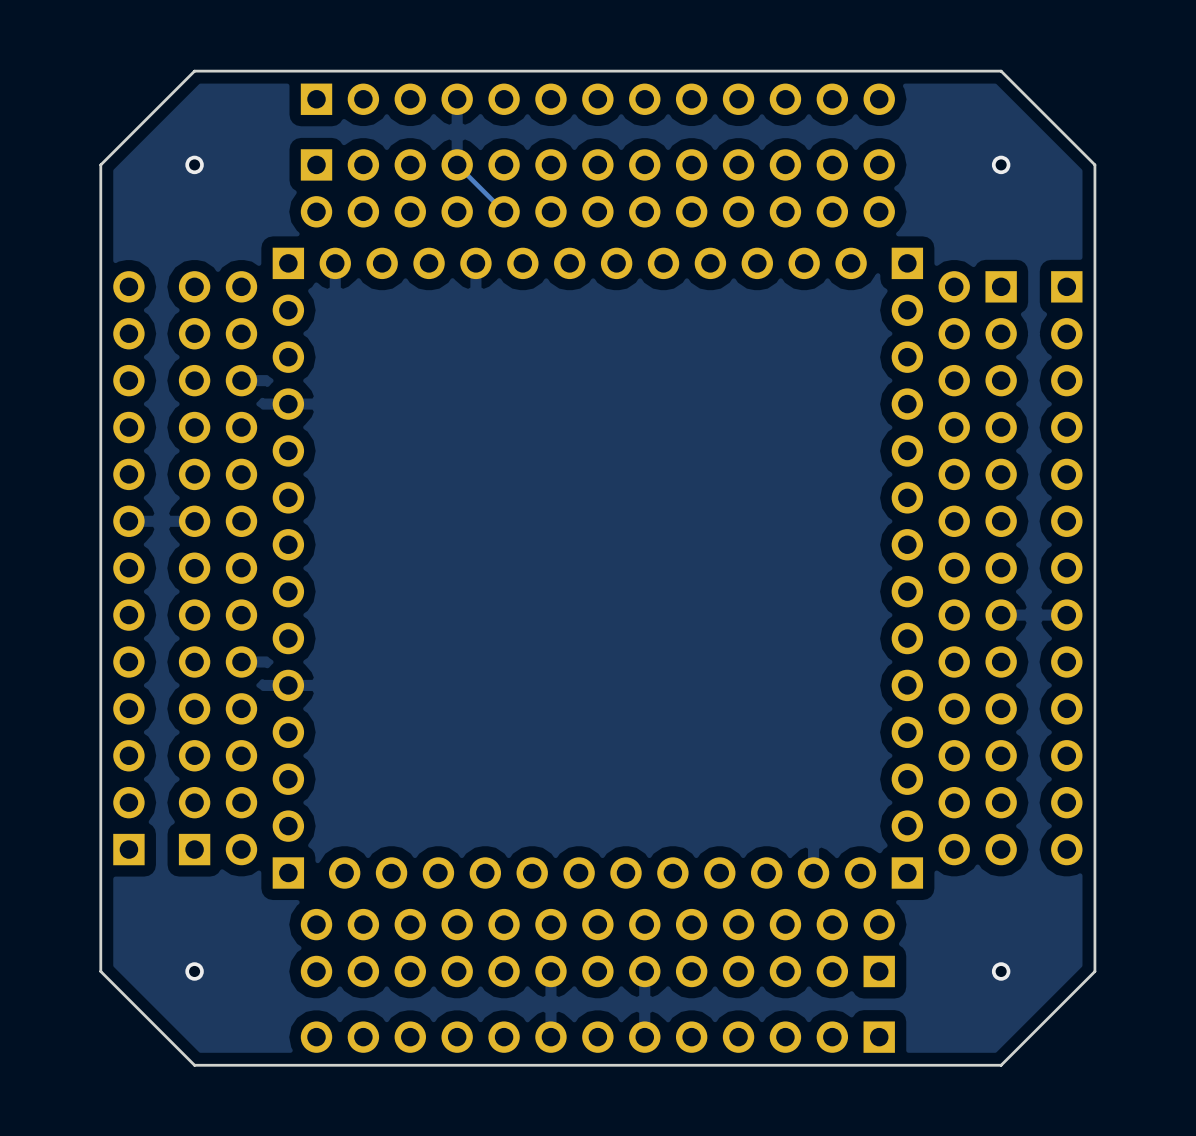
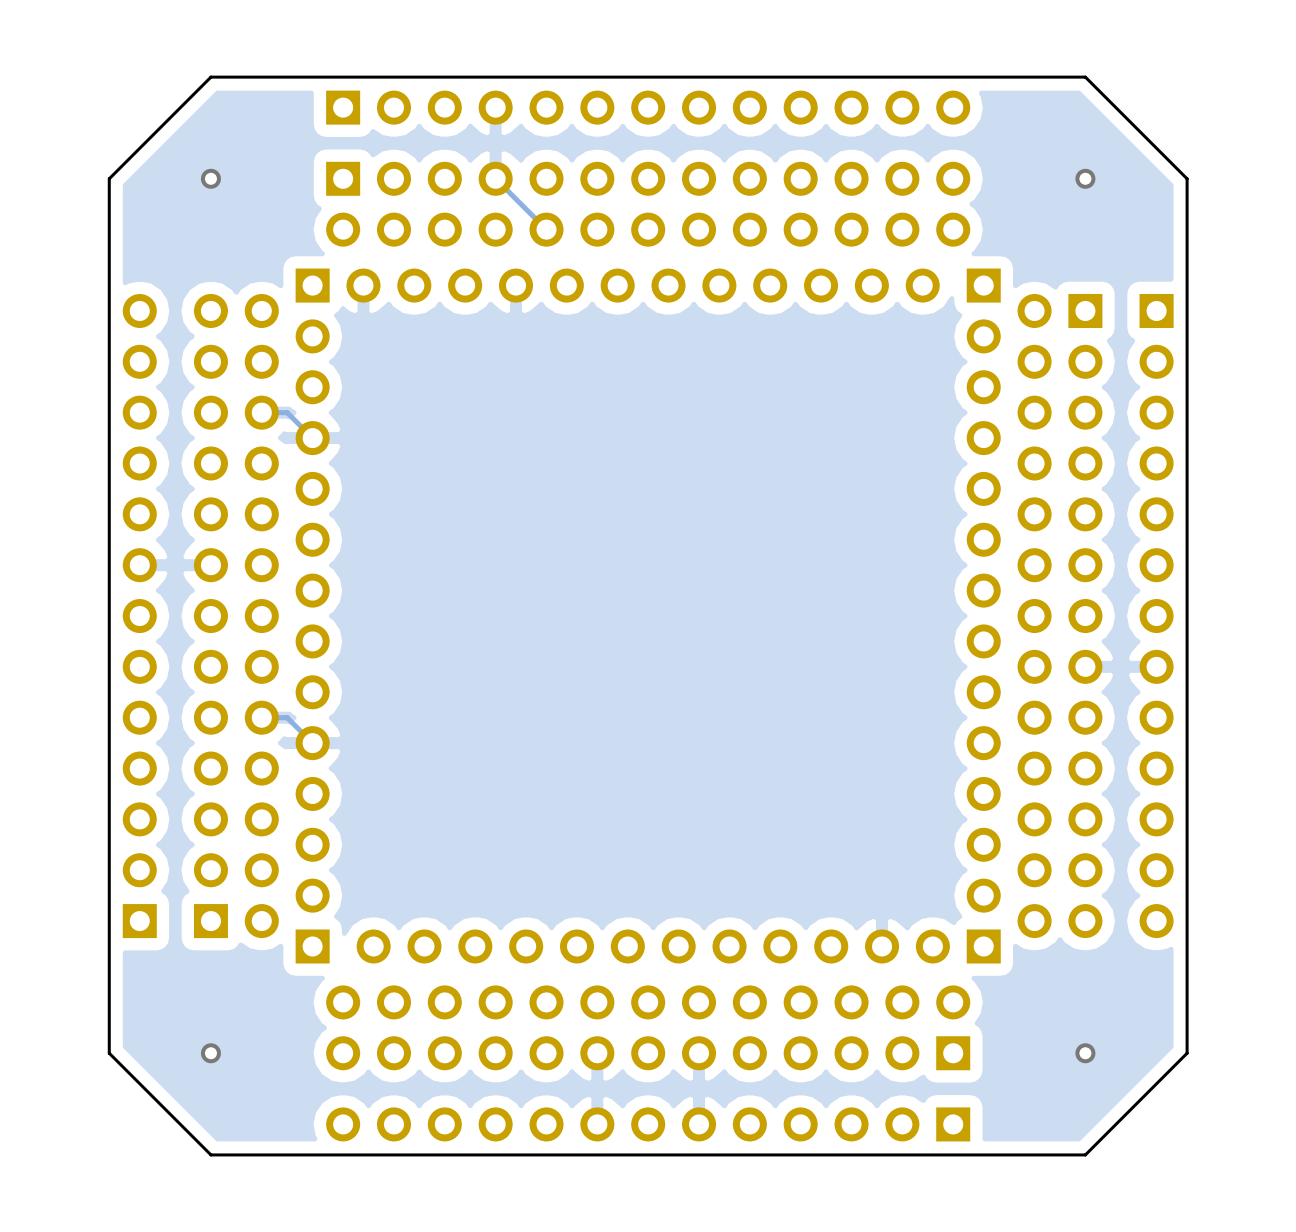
track: none -> (261, 412) (287, 412) (312, 438)
track: none -> (261, 717) (287, 717) (312, 743)

